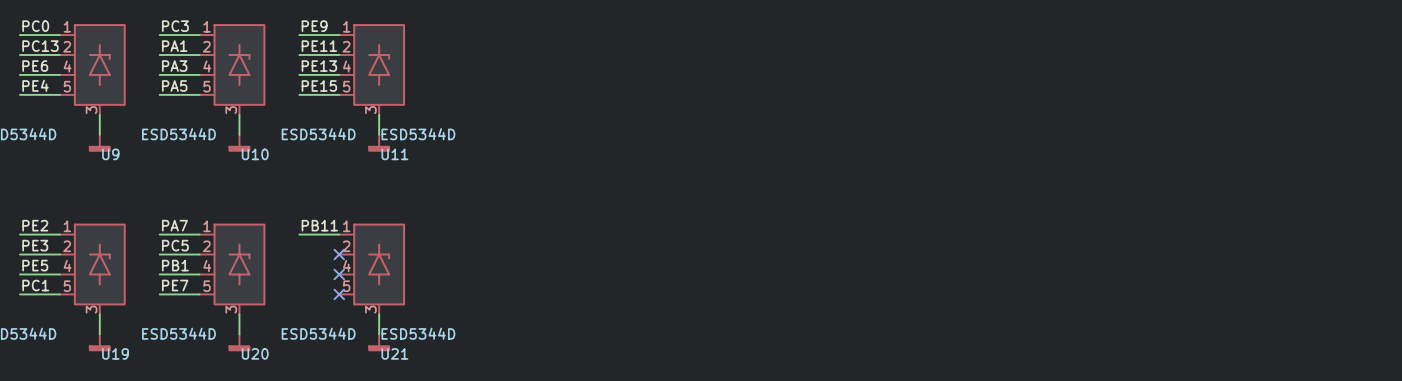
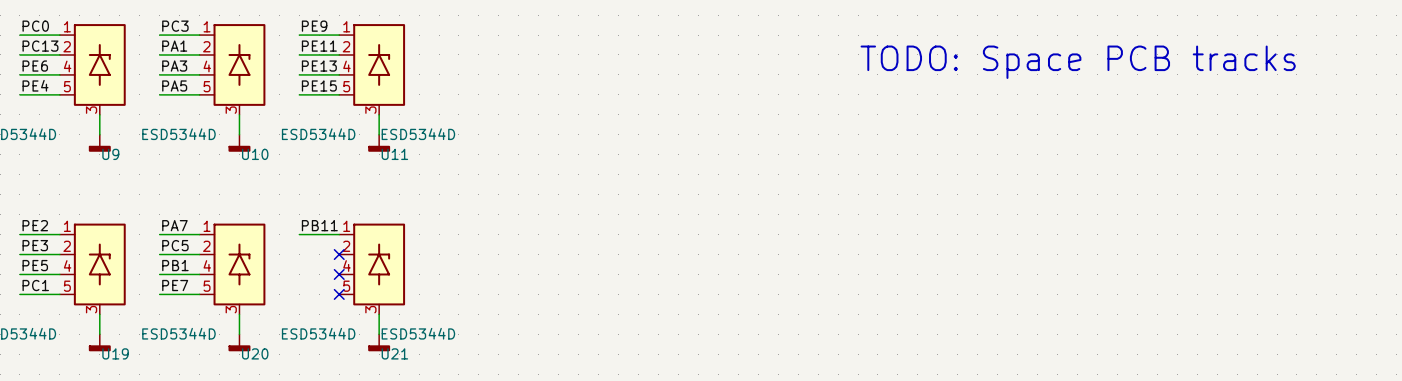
text: none -> TODO: Space PCB tracks (1078, 62)

